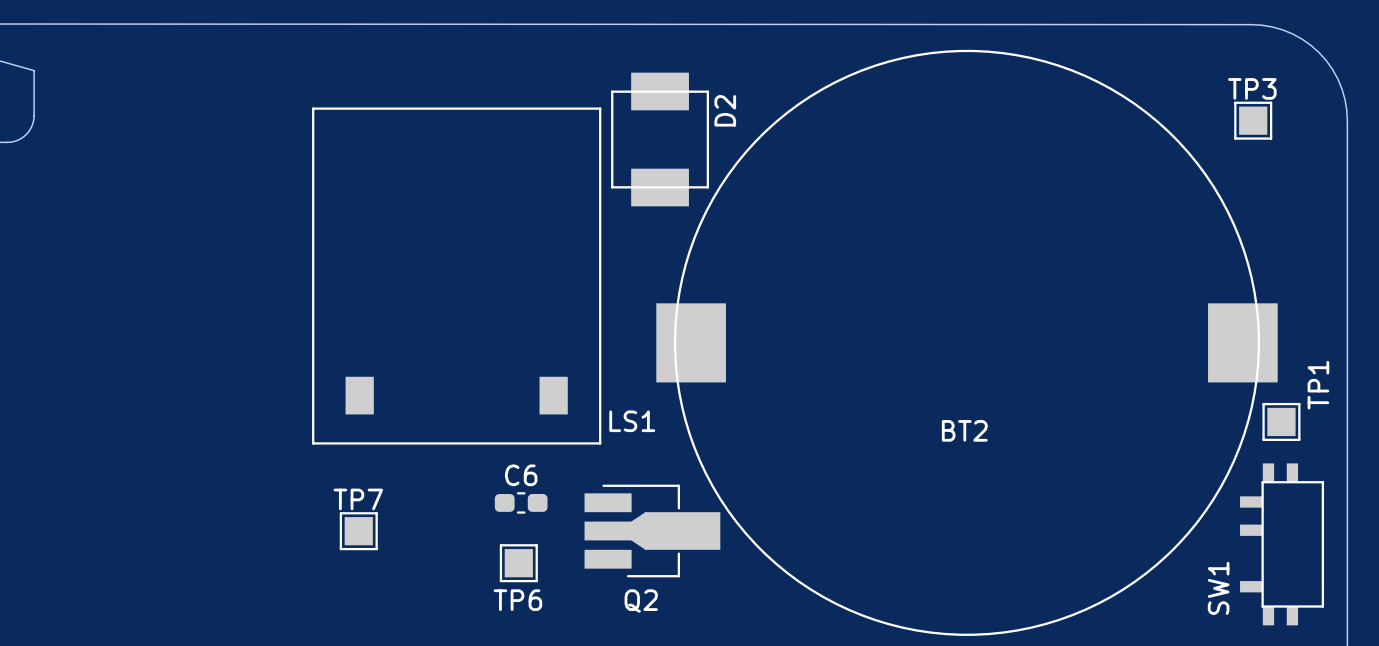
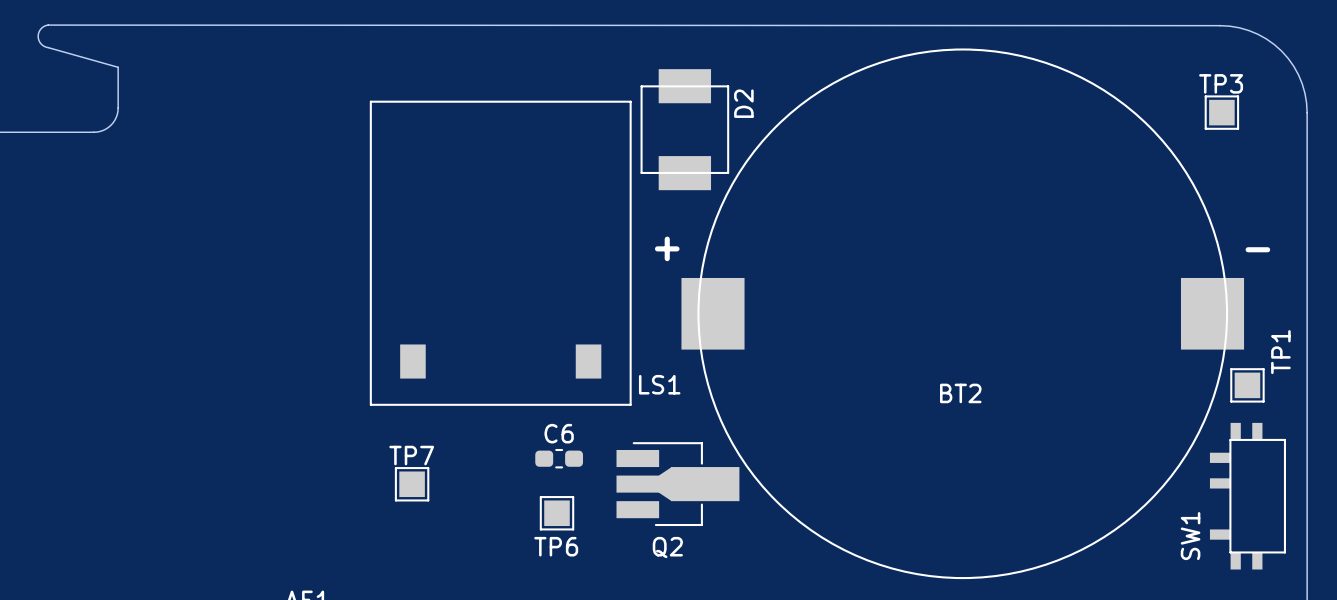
text: none -> + (667, 248)
text: none -> - (1257, 249)

